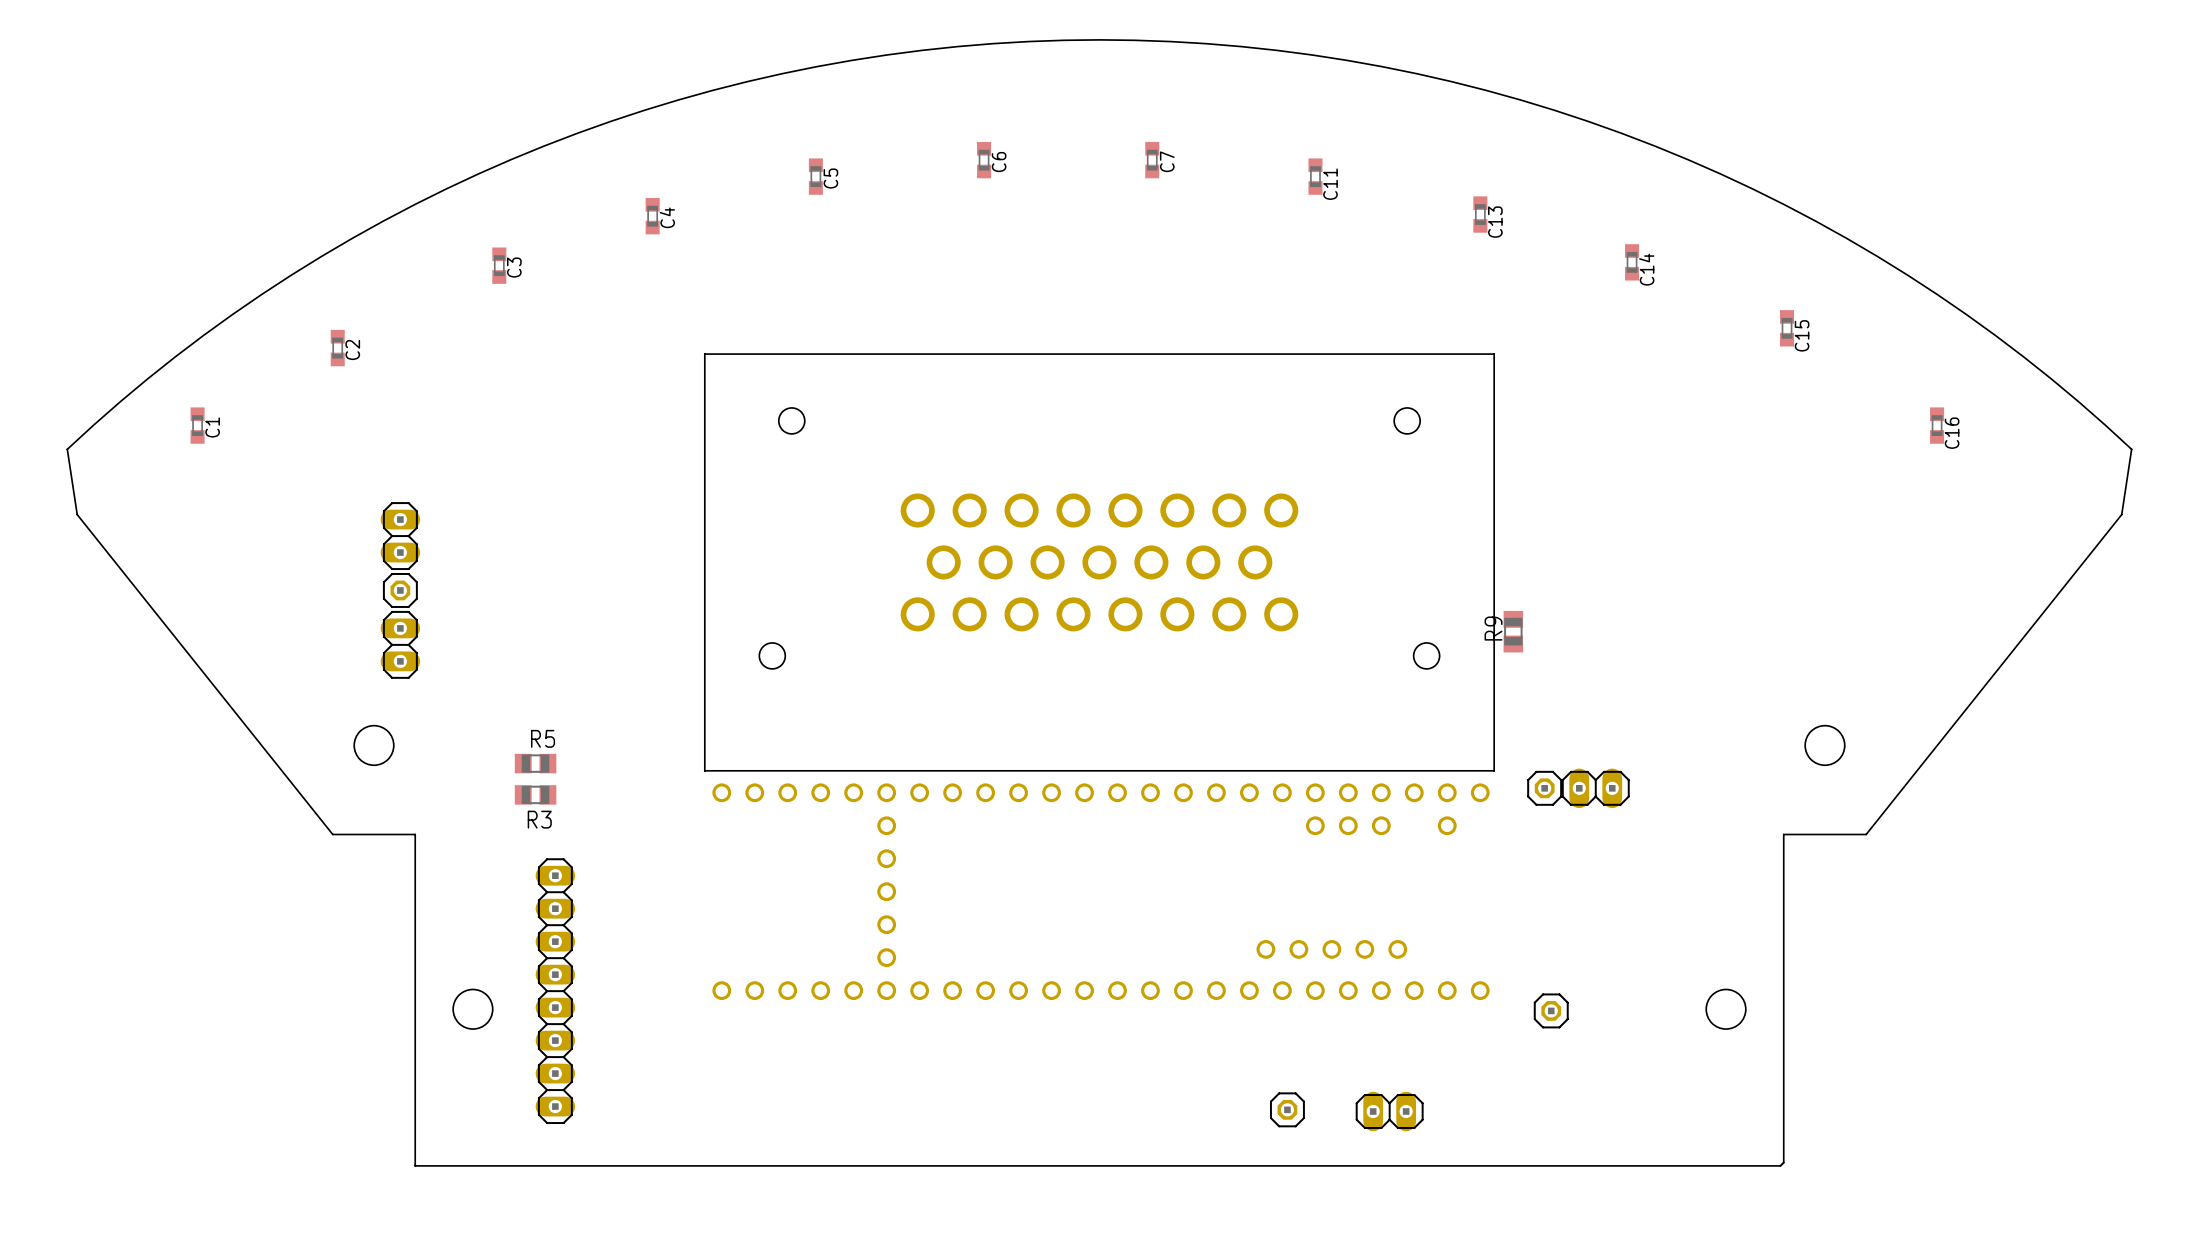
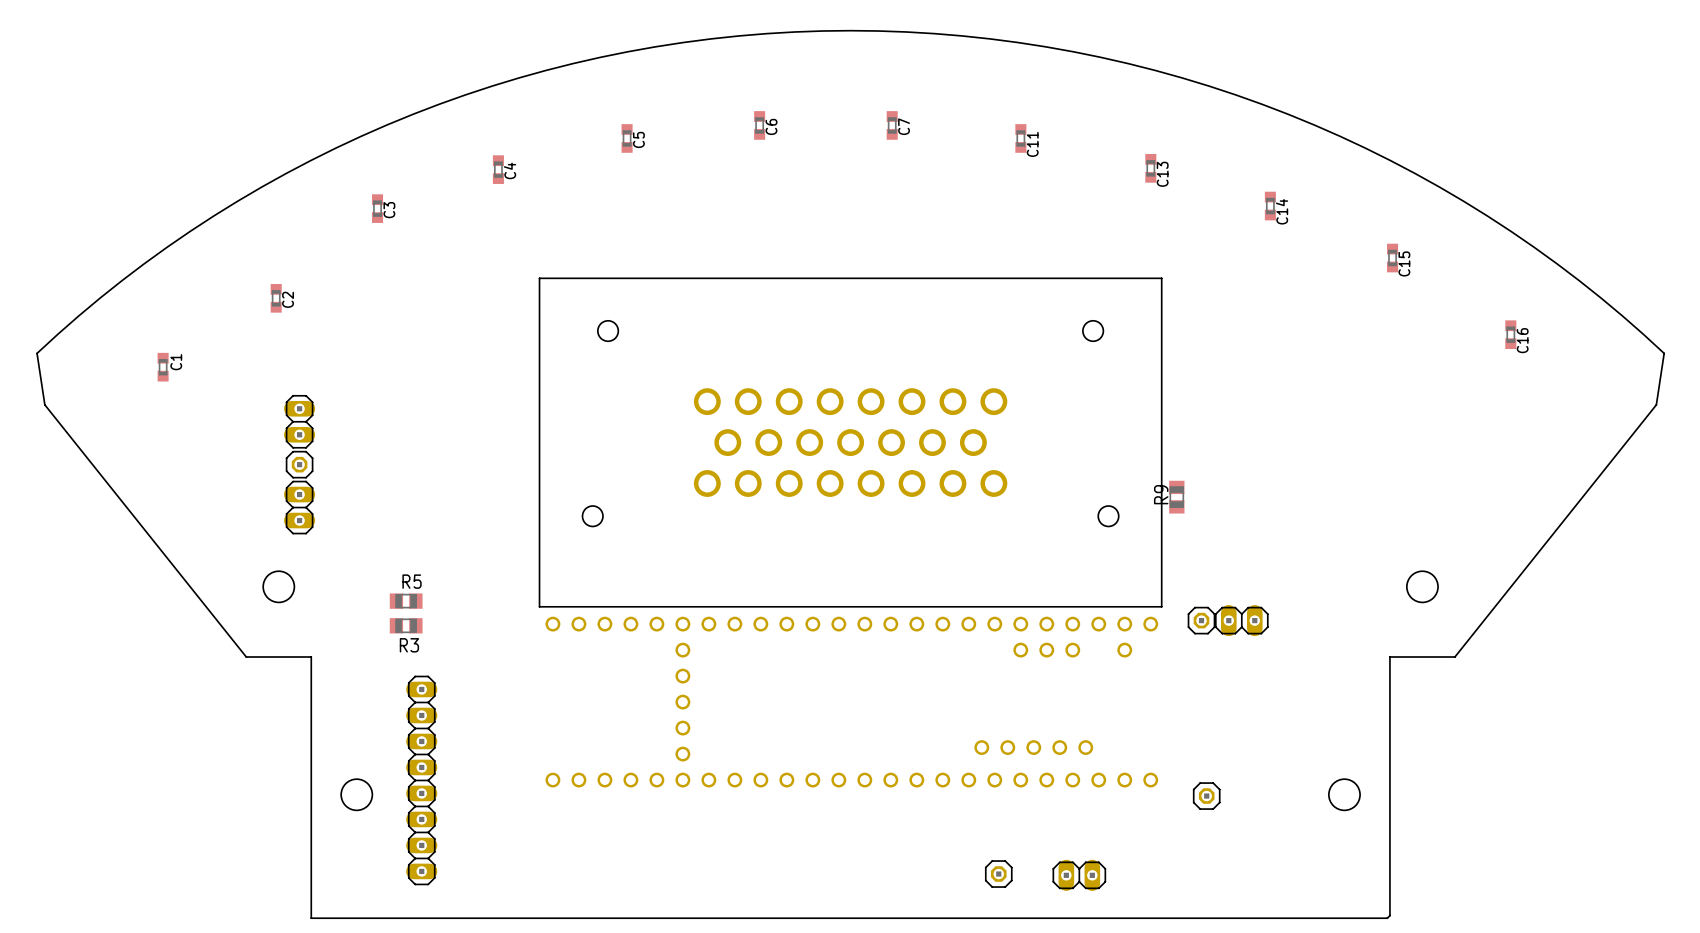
C2 position: (337, 348) -> (276, 298)
C1 position: (197, 425) -> (163, 367)
C1 name position: C1 (212, 427) -> C1 (176, 362)

